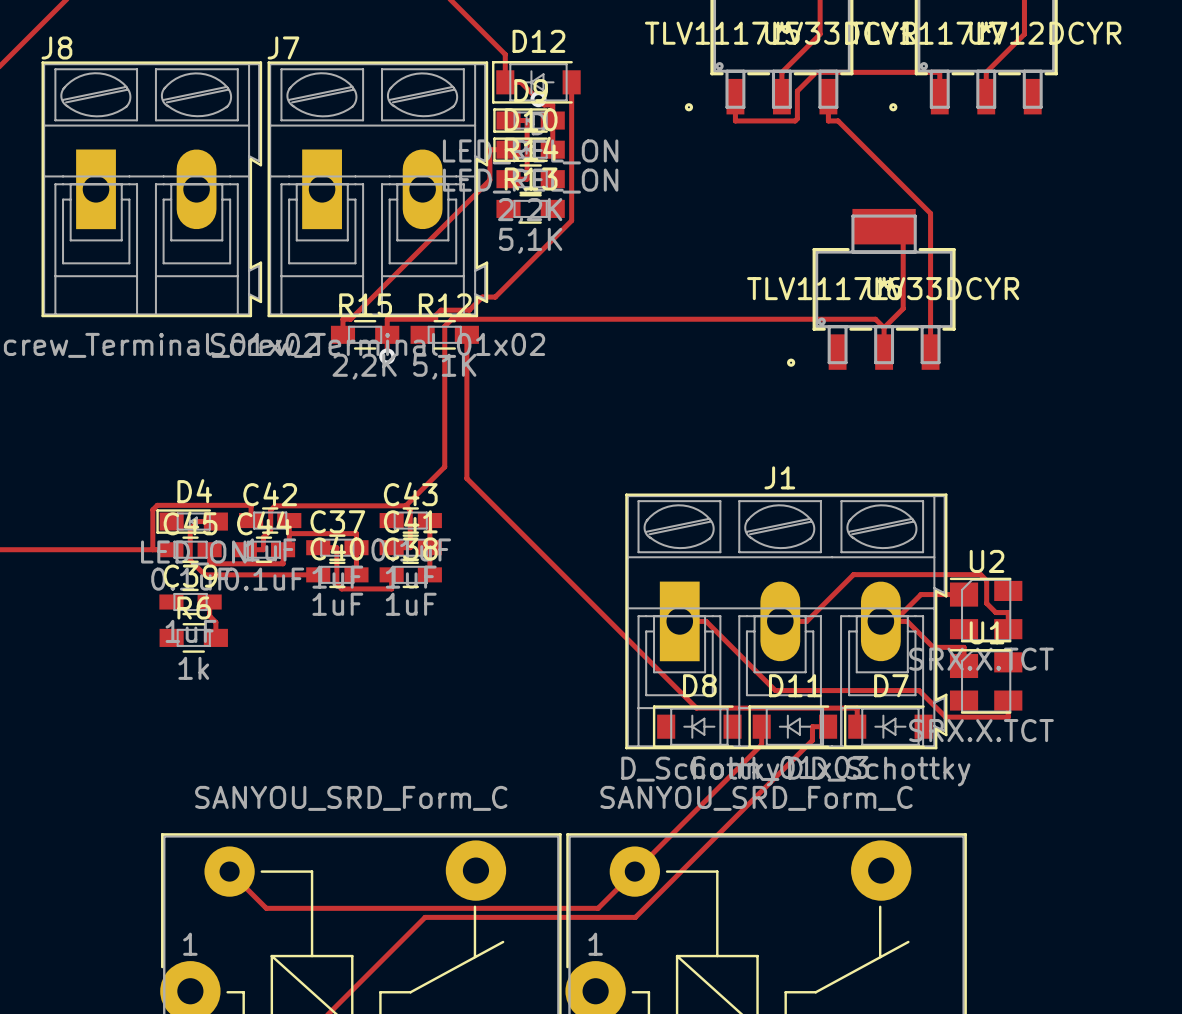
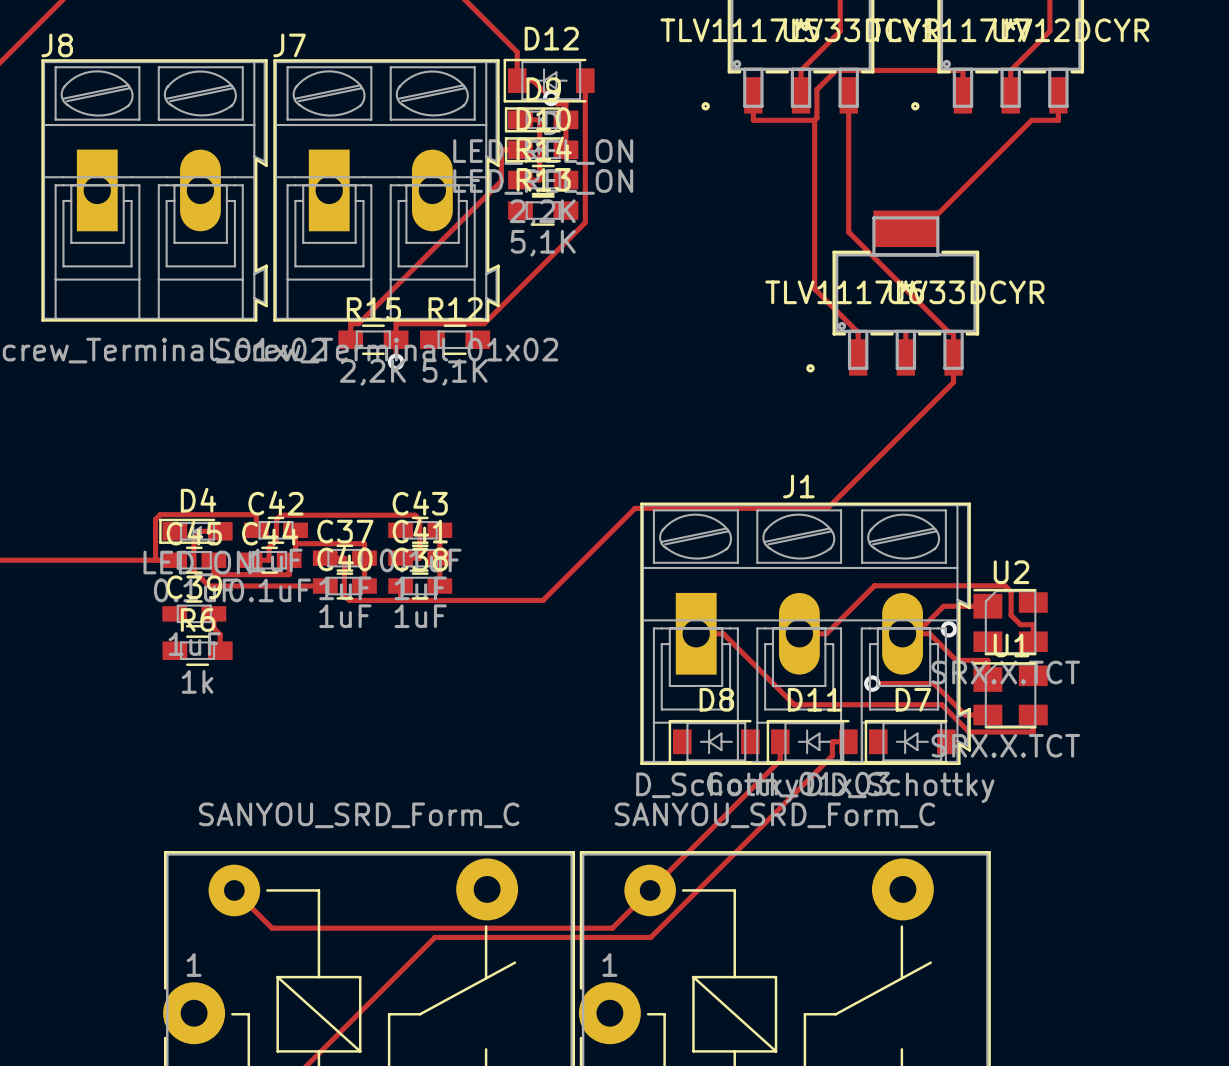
track: none -> (814, 120) (814, 288) (858, 332) (858, 357)
track: (828, 120) (838, 120) (930, 213) (930, 327) -> (848, 120) (848, 232) (949, 332) (953, 332)
track: (901, 226) (903, 226) (903, 308) (884, 327) (875, 319) (473, 319) -> (923, 228) (1031, 120) (1058, 120) (1058, 95)
track: (495, 297) (482, 297) (469, 310) (441, 310) (435, 315) (435, 319) -> (506, 300) (484, 323)
track: (451, 319) (444, 326) (444, 466) (405, 505) -> (462, 323) (445, 323)
track: (466, 334) (466, 478) (696, 708) (857, 708) (857, 726) -> none
track: none -> (953, 357) (953, 382) (827, 508) (635, 508) (542, 600) (400, 600)
via: none -> (948, 629)
track: none -> (872, 683) (933, 683) (965, 714) (987, 714)
via: none -> (872, 683)

